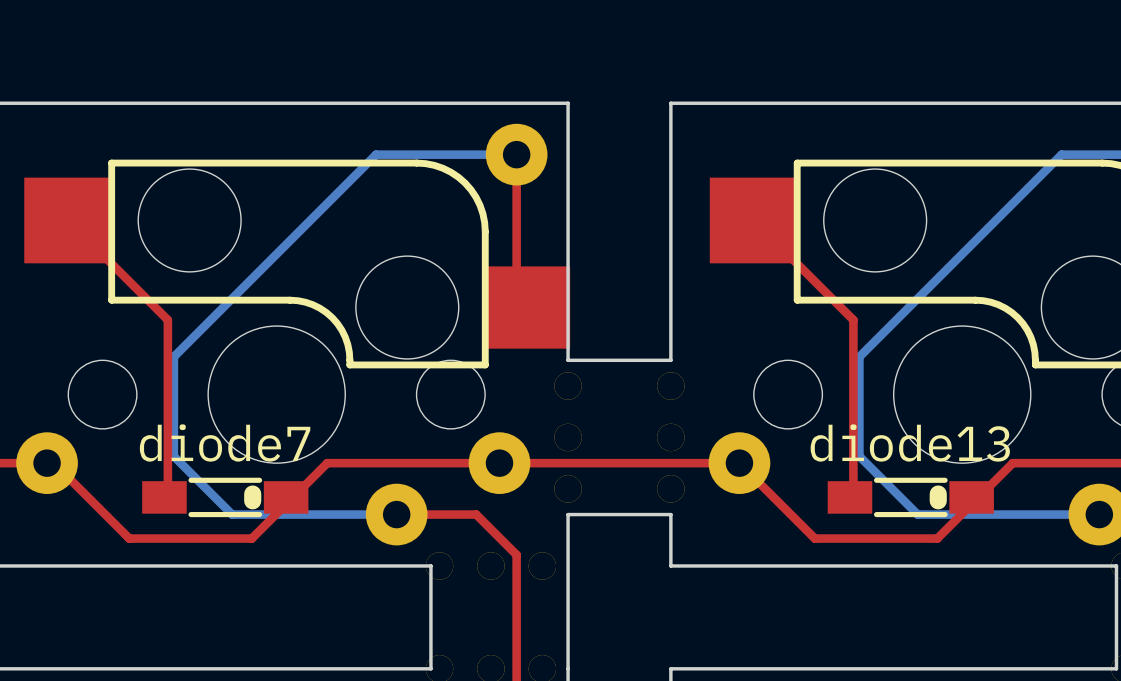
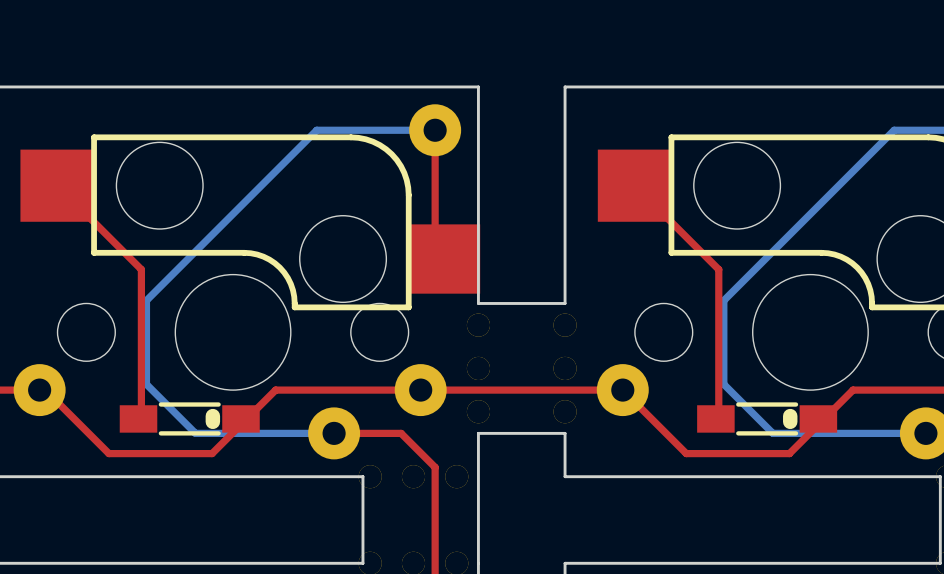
diode7 name: diode7 (225, 442) -> none
diode13 name: diode13 (910, 442) -> none

